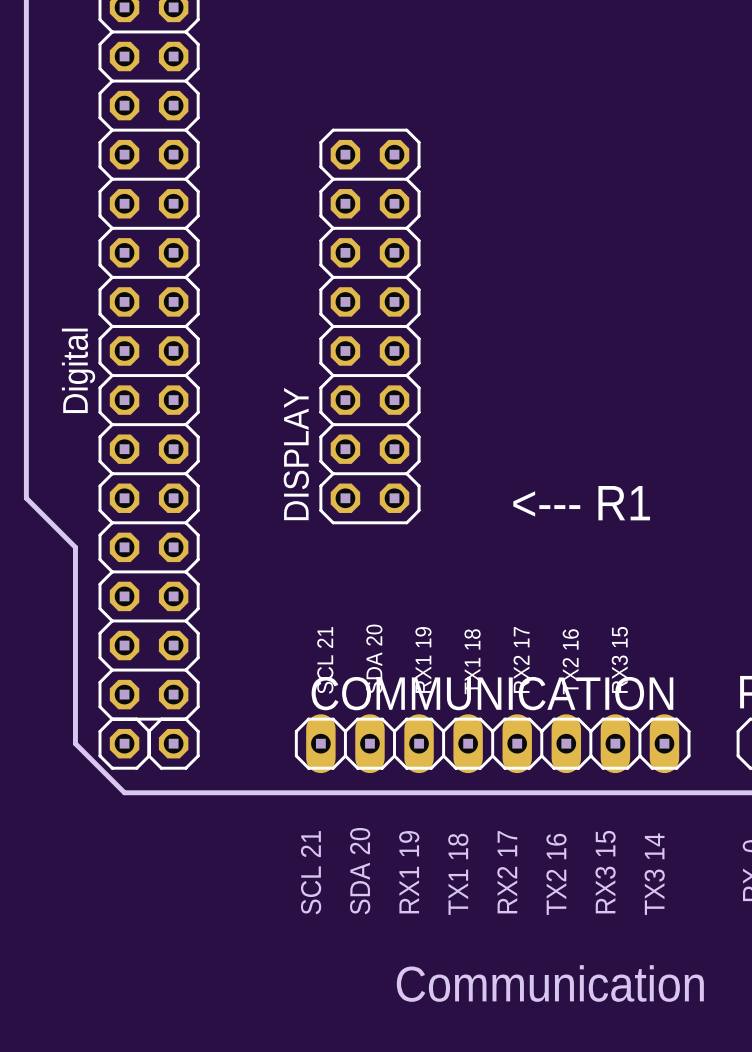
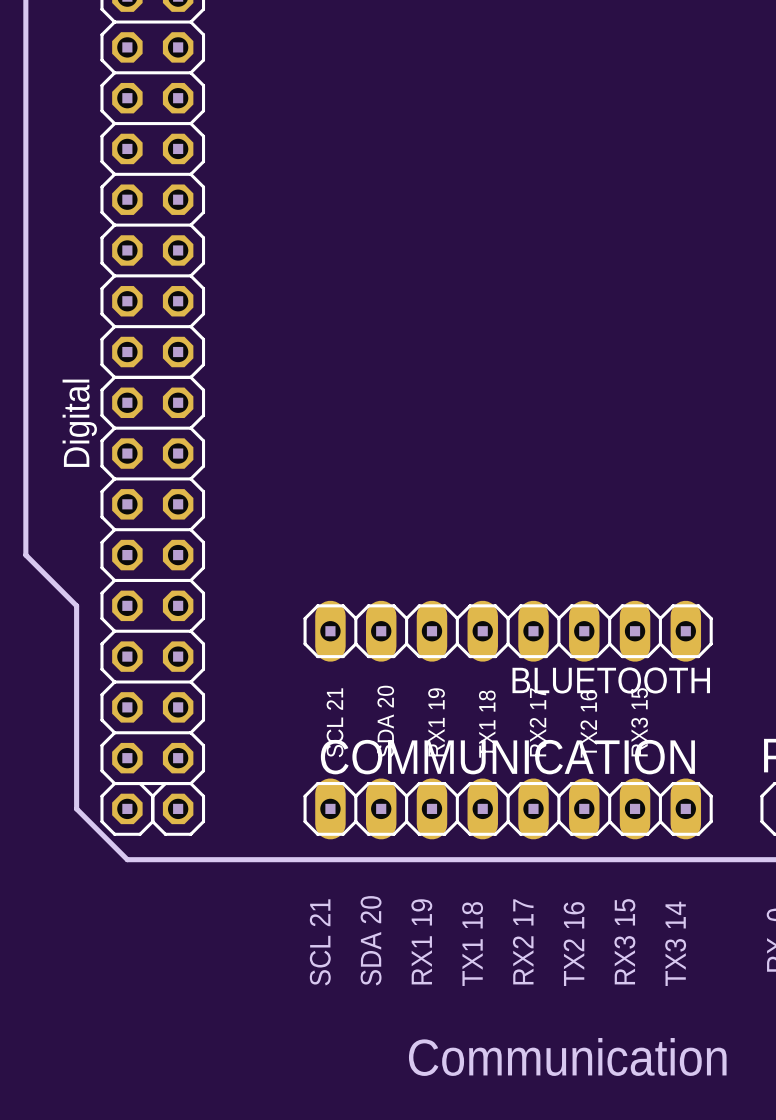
DISPLAY: (369, 326) -> none
text: <--- R1 (581, 503) -> none
BLUETOOTH: none -> (508, 631)

